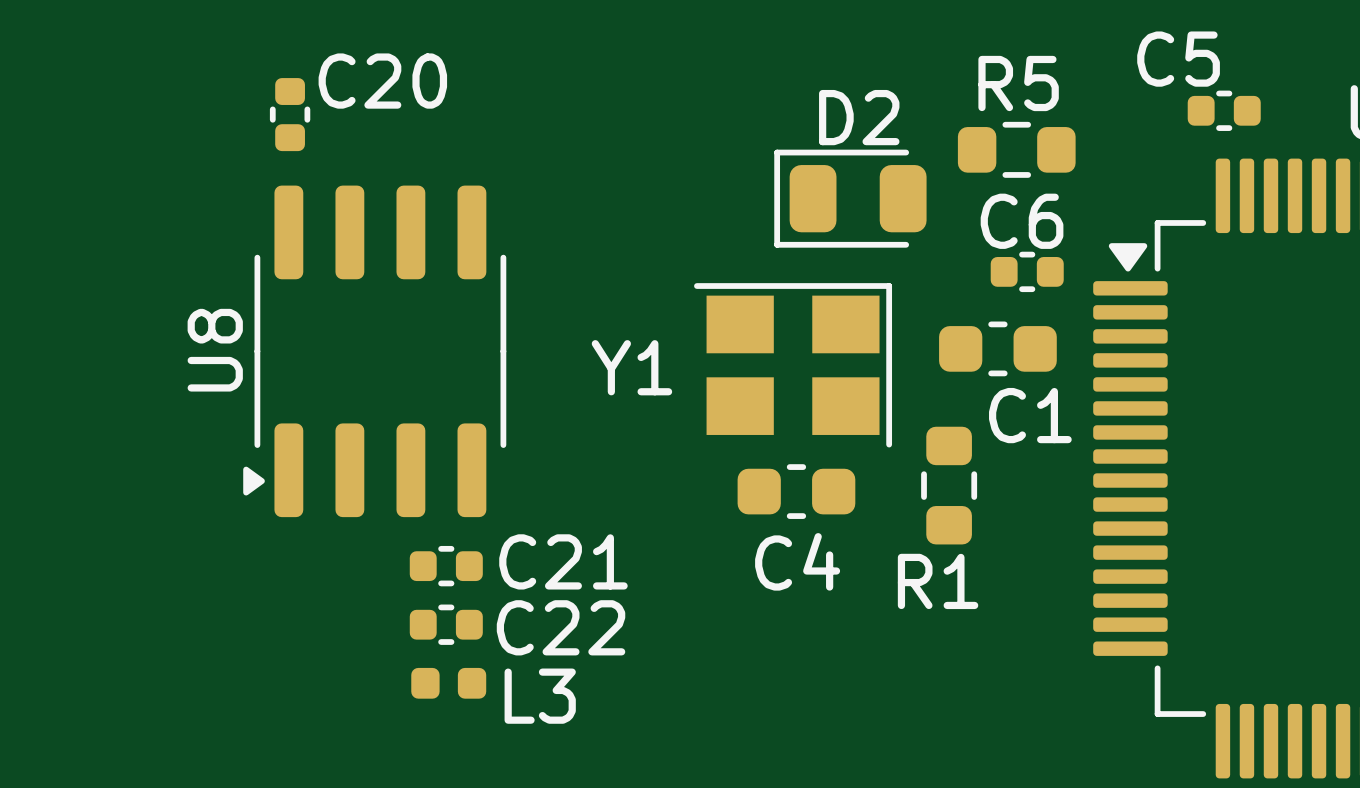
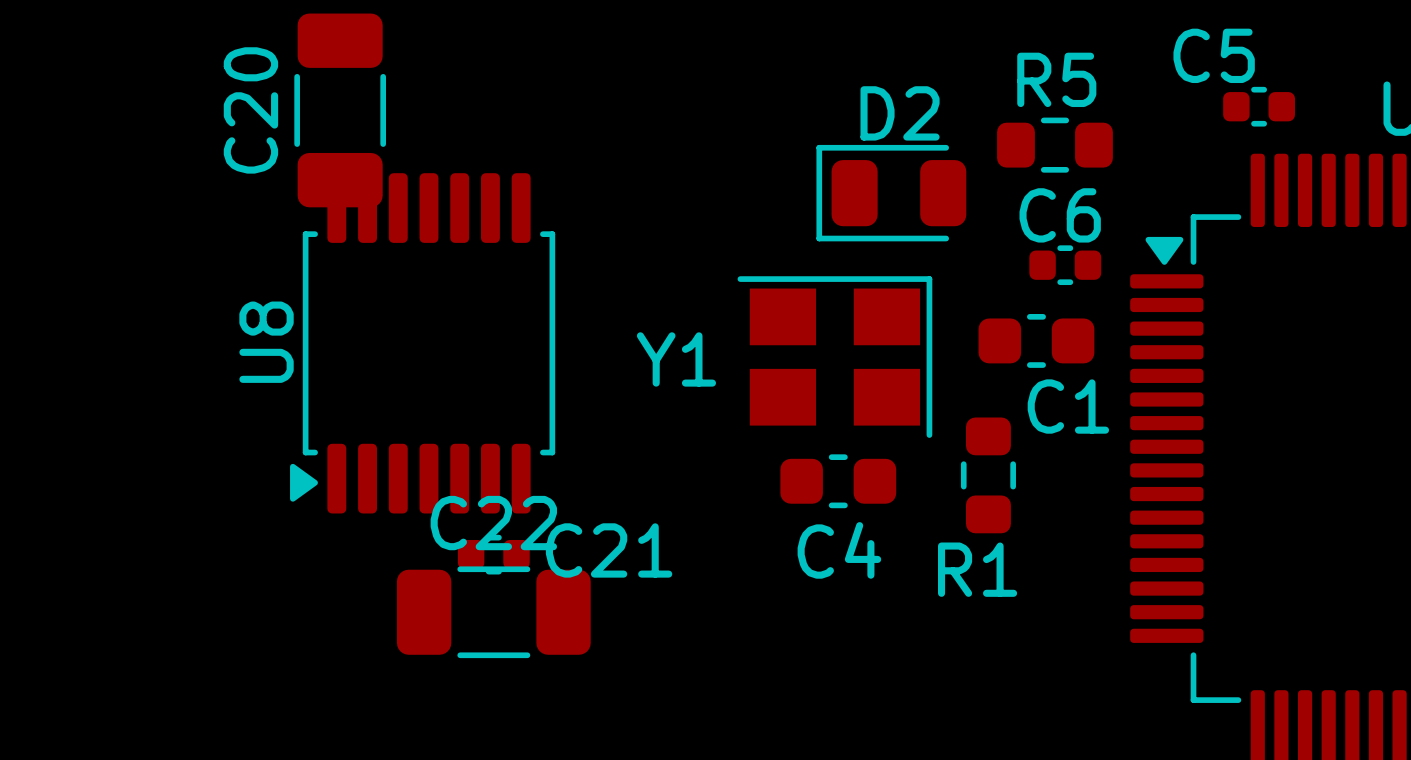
C20 footprint: [269, 78, 311, 152] -> [294, 13, 387, 208]
C20 name position: C20 (382, 81) -> C20 (250, 110)
U8 footprint: [243, 185, 507, 518] -> [290, 173, 556, 514]
C22 footprint: [409, 604, 483, 645] -> [396, 566, 591, 659]
C22 name position: C22 (561, 627) -> C22 (493, 523)
L3: (448, 683) -> none

